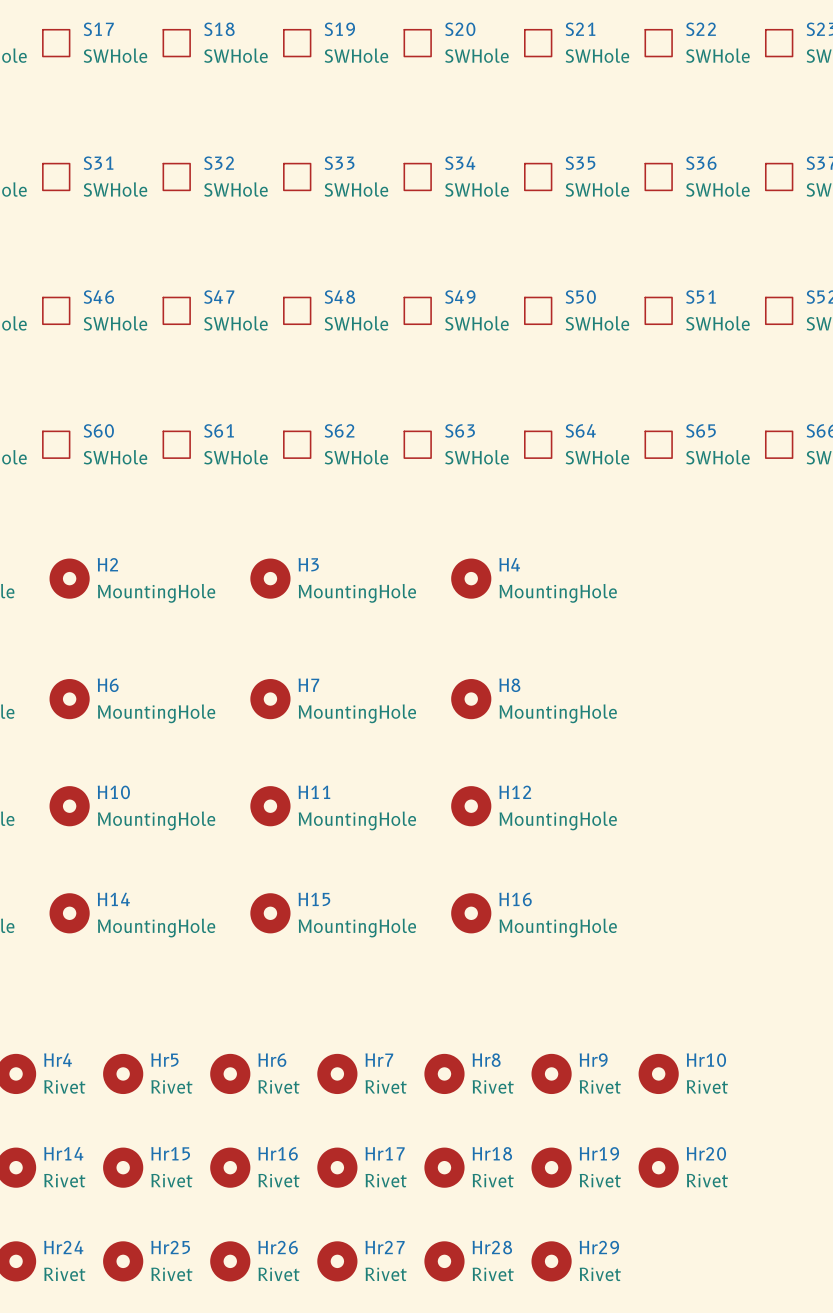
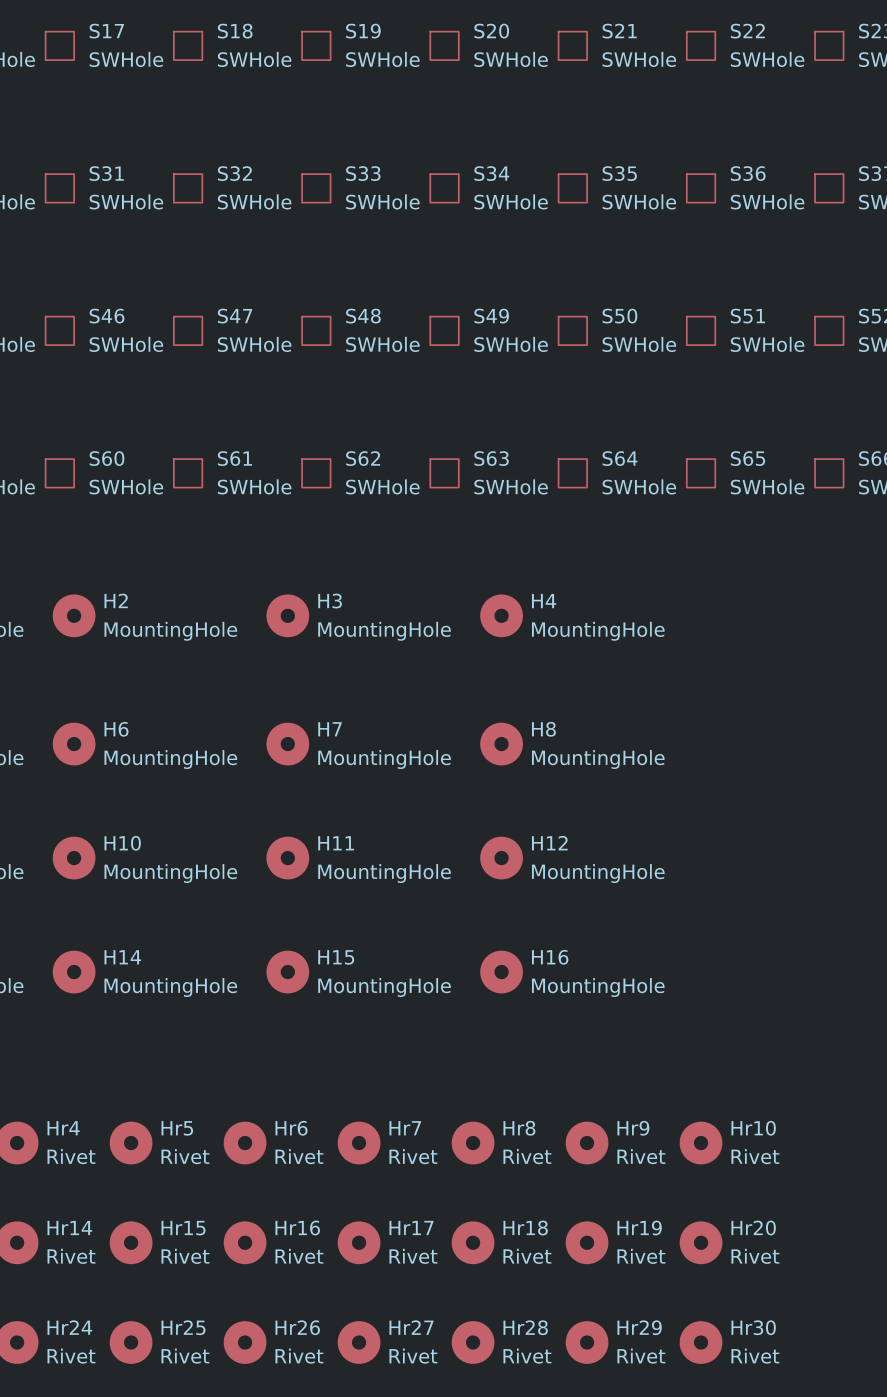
Hr30: none -> Rivet (701, 1342)

